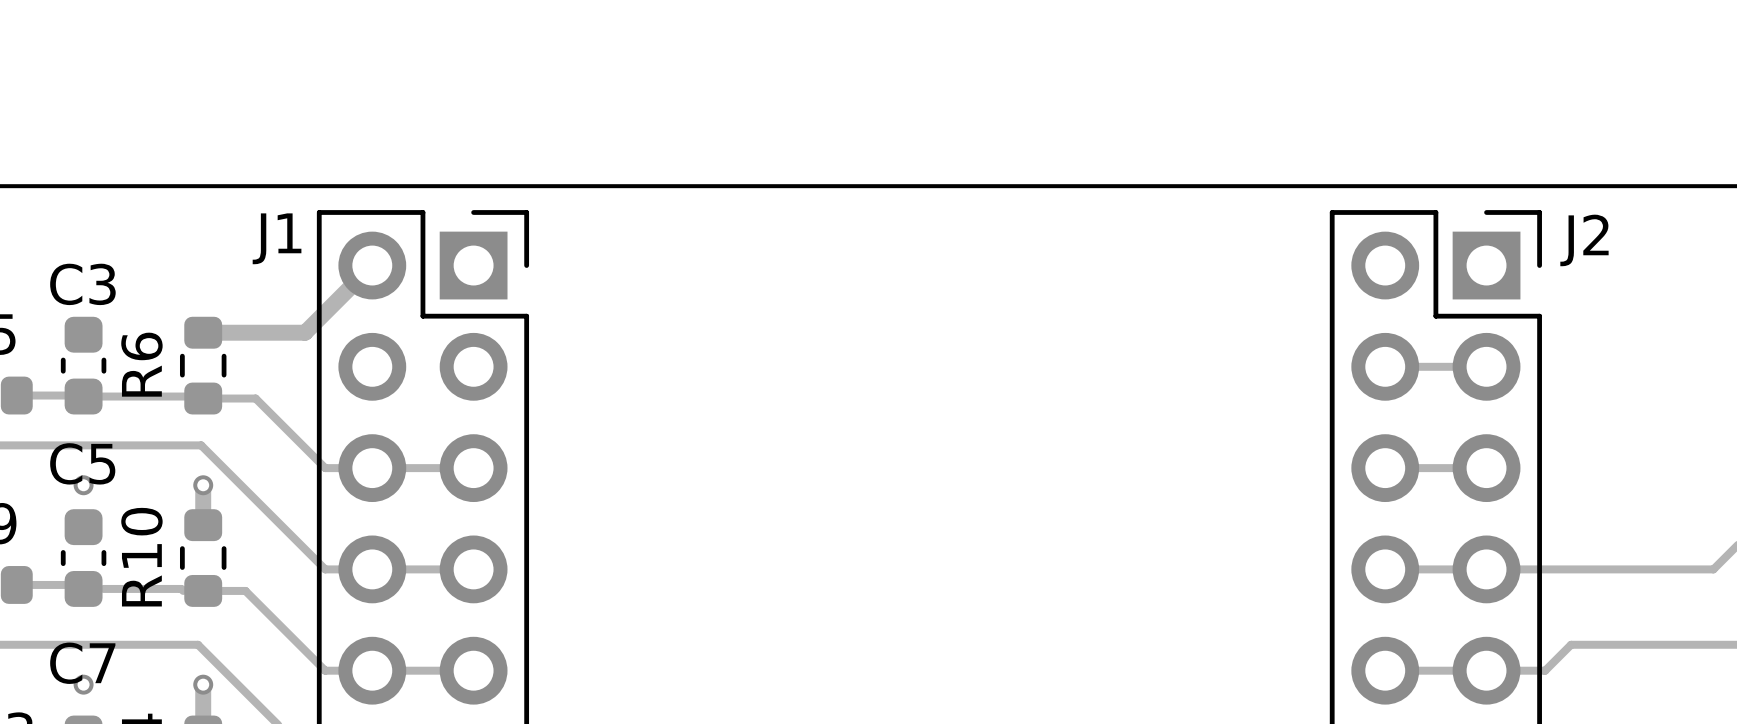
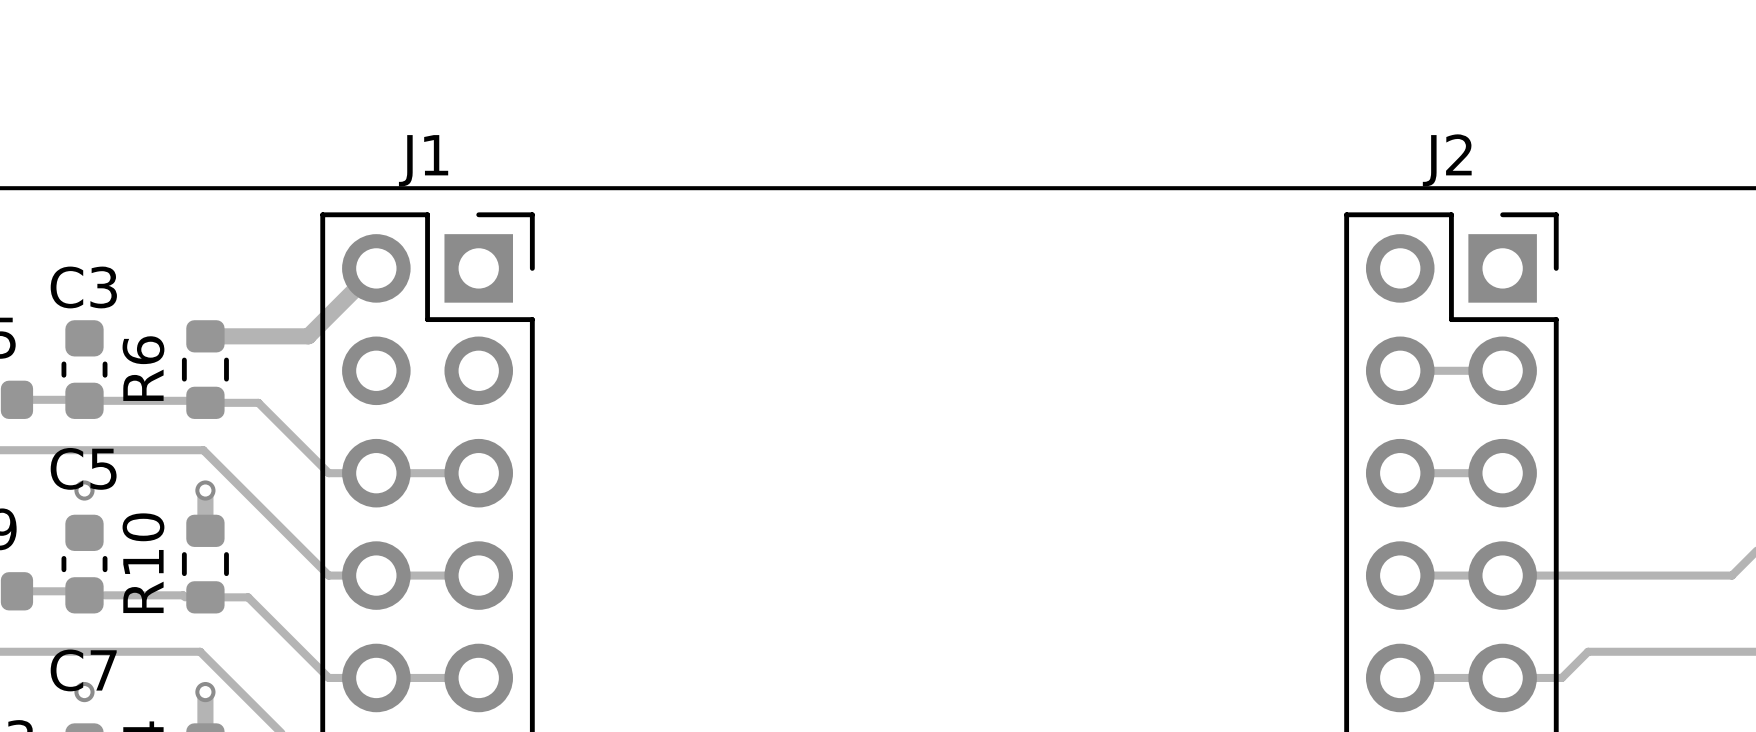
J1 name position: J1 (277, 238) -> J1 (423, 160)
J2 name position: J2 (1584, 240) -> J2 (1447, 160)

